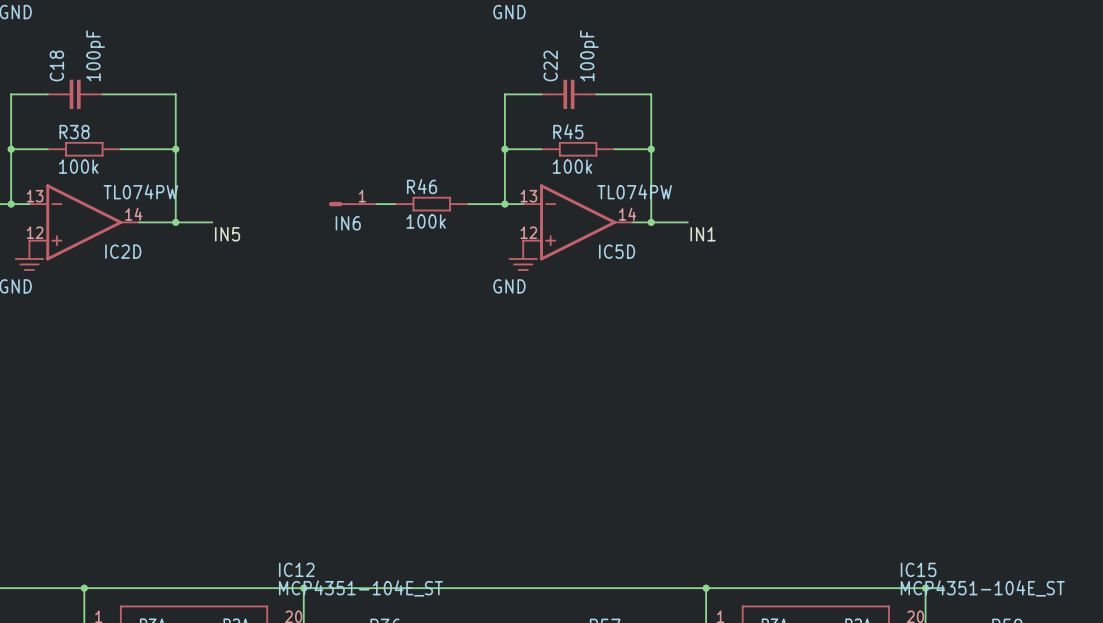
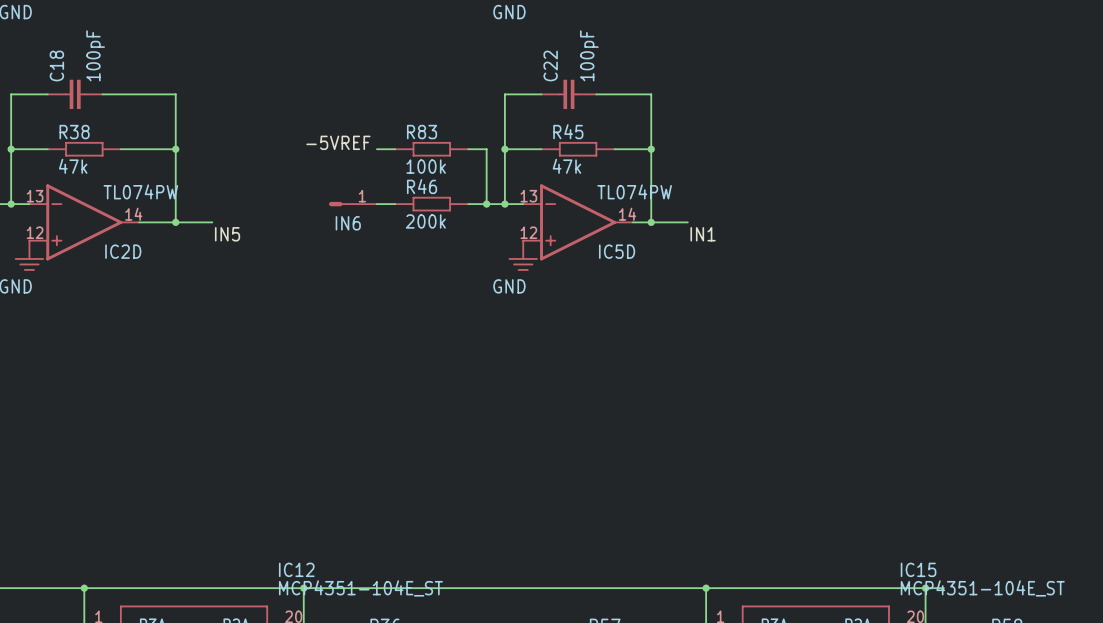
label: none -> -5VREF (338, 142)
wire: none -> (376, 149) (395, 149)
R83: none -> 100k (431, 149)
wire: none -> (468, 149) (486, 149) (486, 204)
R38 value: 100k (78, 166) -> 47k (73, 166)
R45 value: 100k (572, 166) -> 47k (566, 166)
junction: none -> (486, 204)
R46 value: 100k (426, 221) -> 200k (425, 221)

